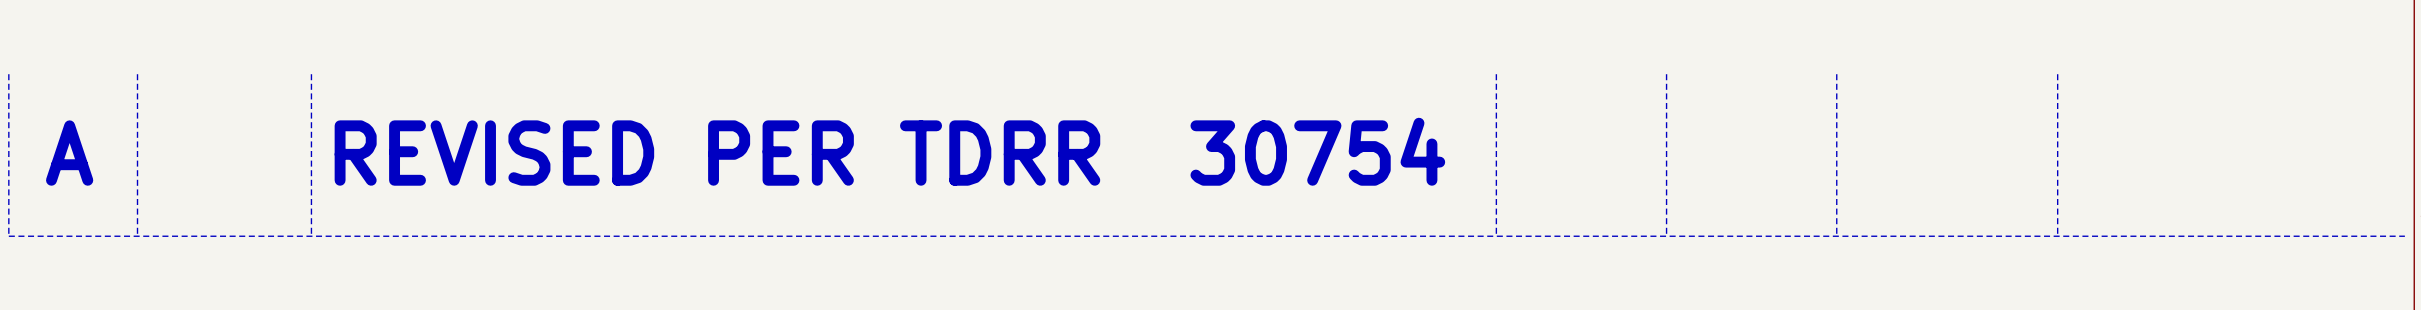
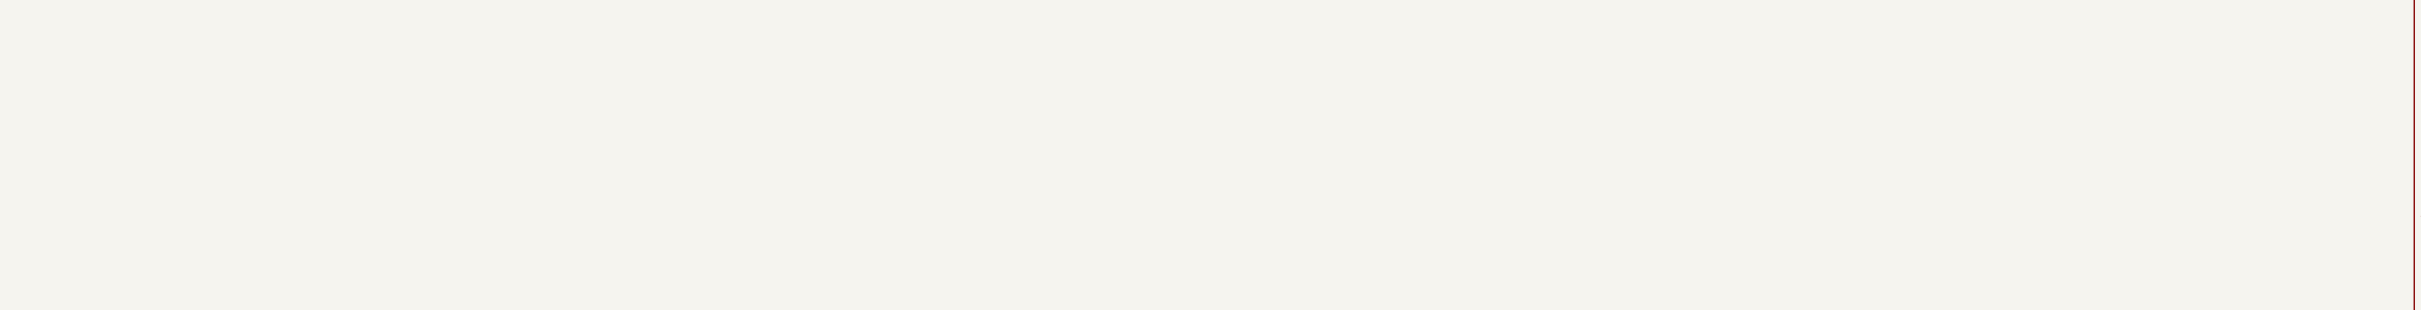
line: (8, 74) (8, 236) (2404, 236) -> none
line: (137, 74) (137, 236) -> none
line: (311, 74) (311, 236) -> none
line: (1496, 74) (1496, 236) -> none
line: (1666, 74) (1666, 236) -> none
line: (1836, 74) (1836, 236) -> none
line: (2057, 74) (2057, 236) -> none
text: REVISED PER TDRR 30754 (889, 151) -> none
text: A (69, 153) -> none

